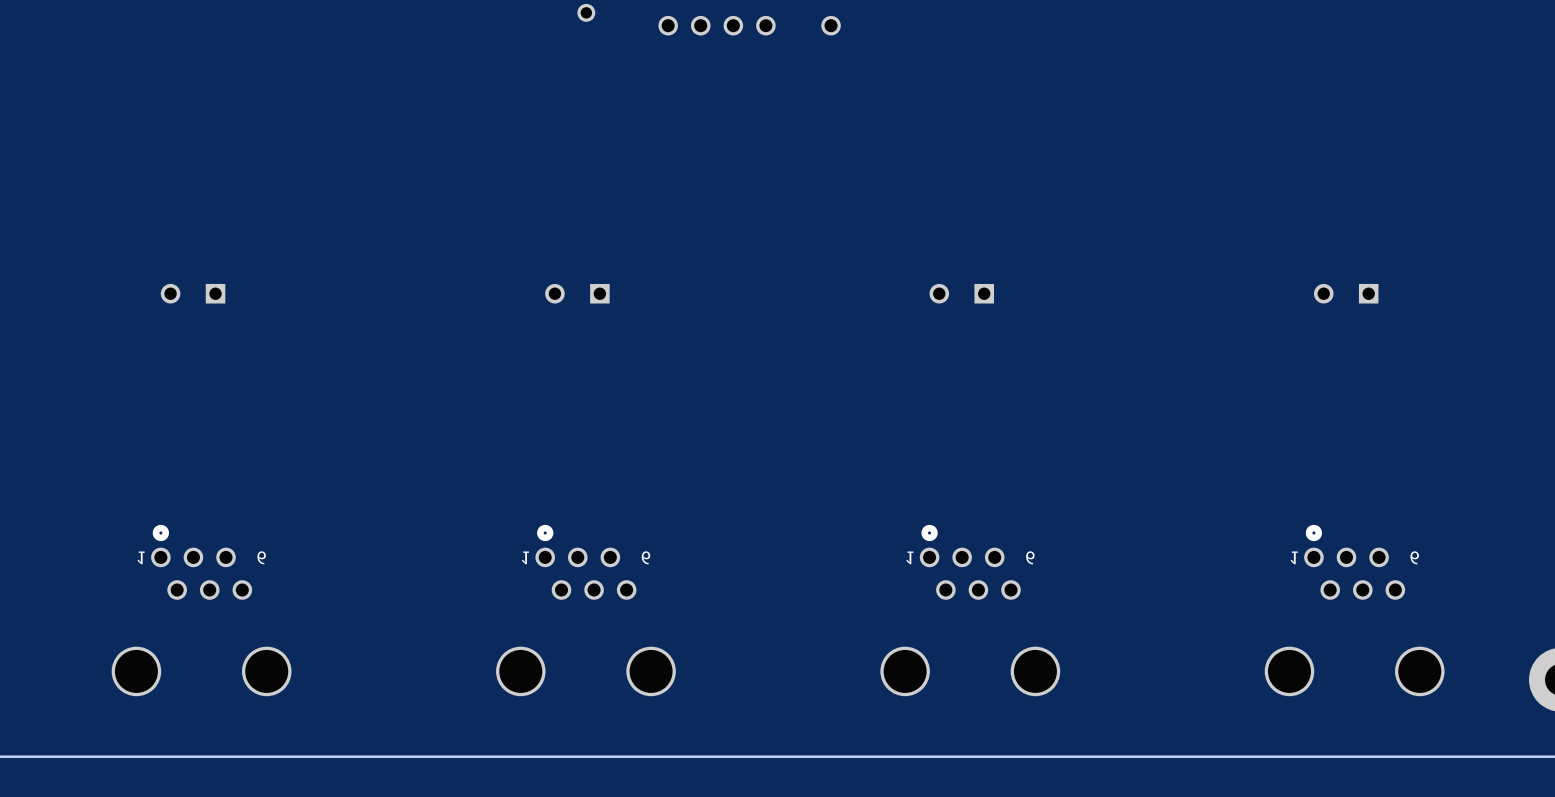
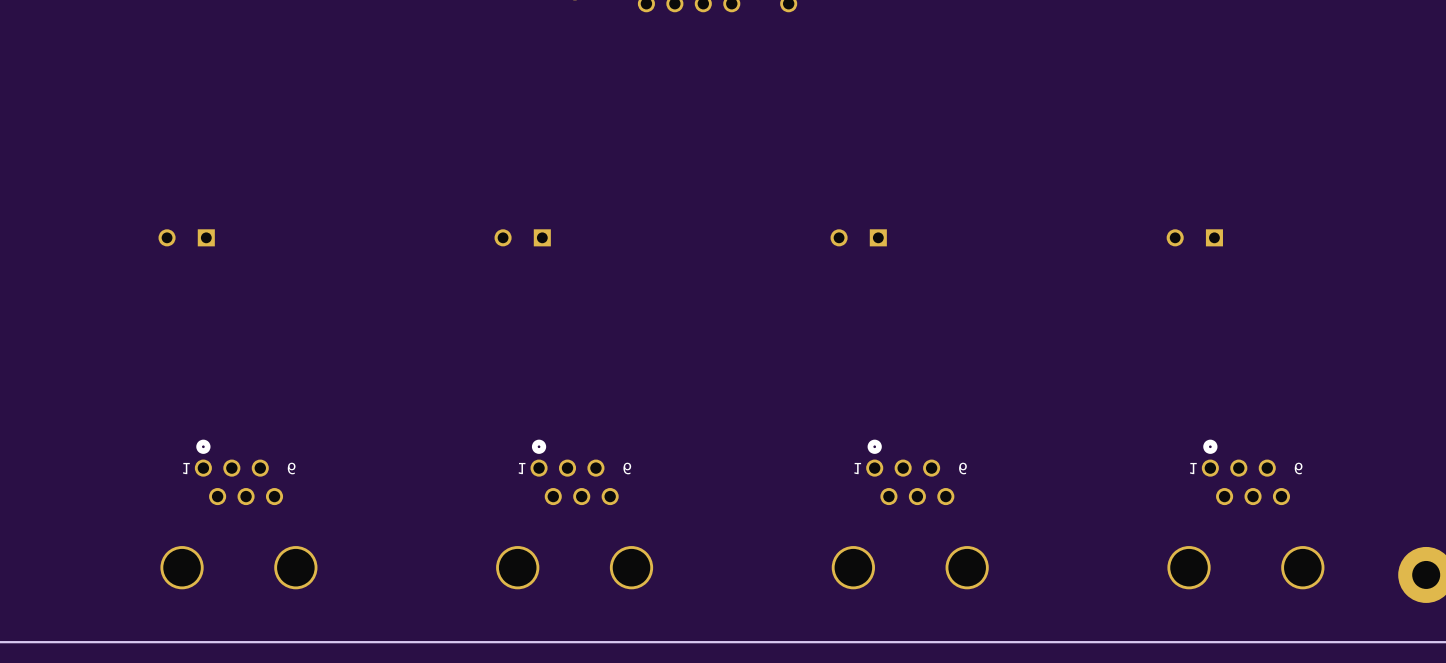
part position: (193, 293) -> (186, 237)
part position: (577, 293) -> (522, 237)
part position: (961, 293) -> (858, 237)
part position: (1346, 293) -> (1194, 237)

